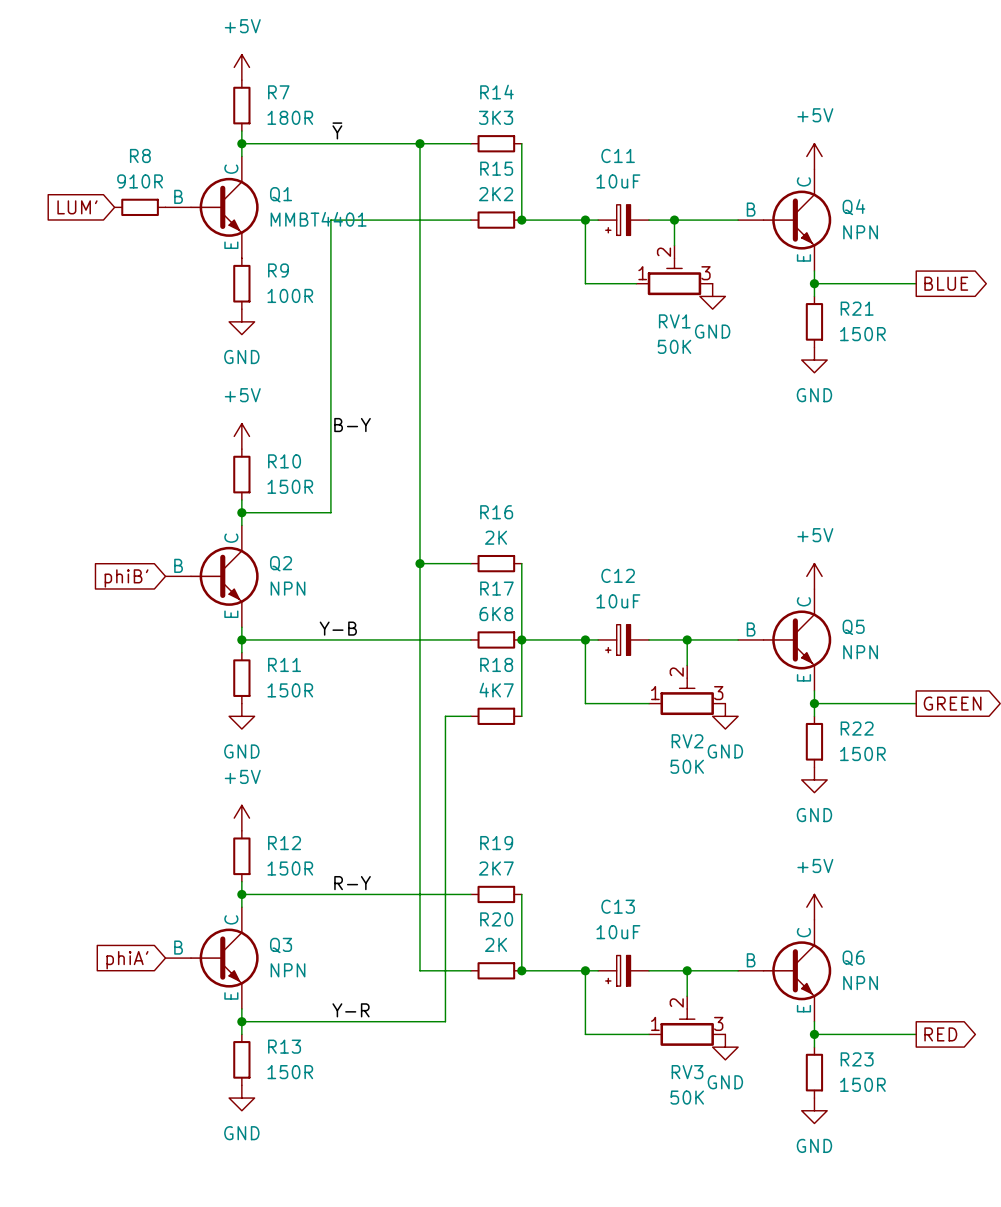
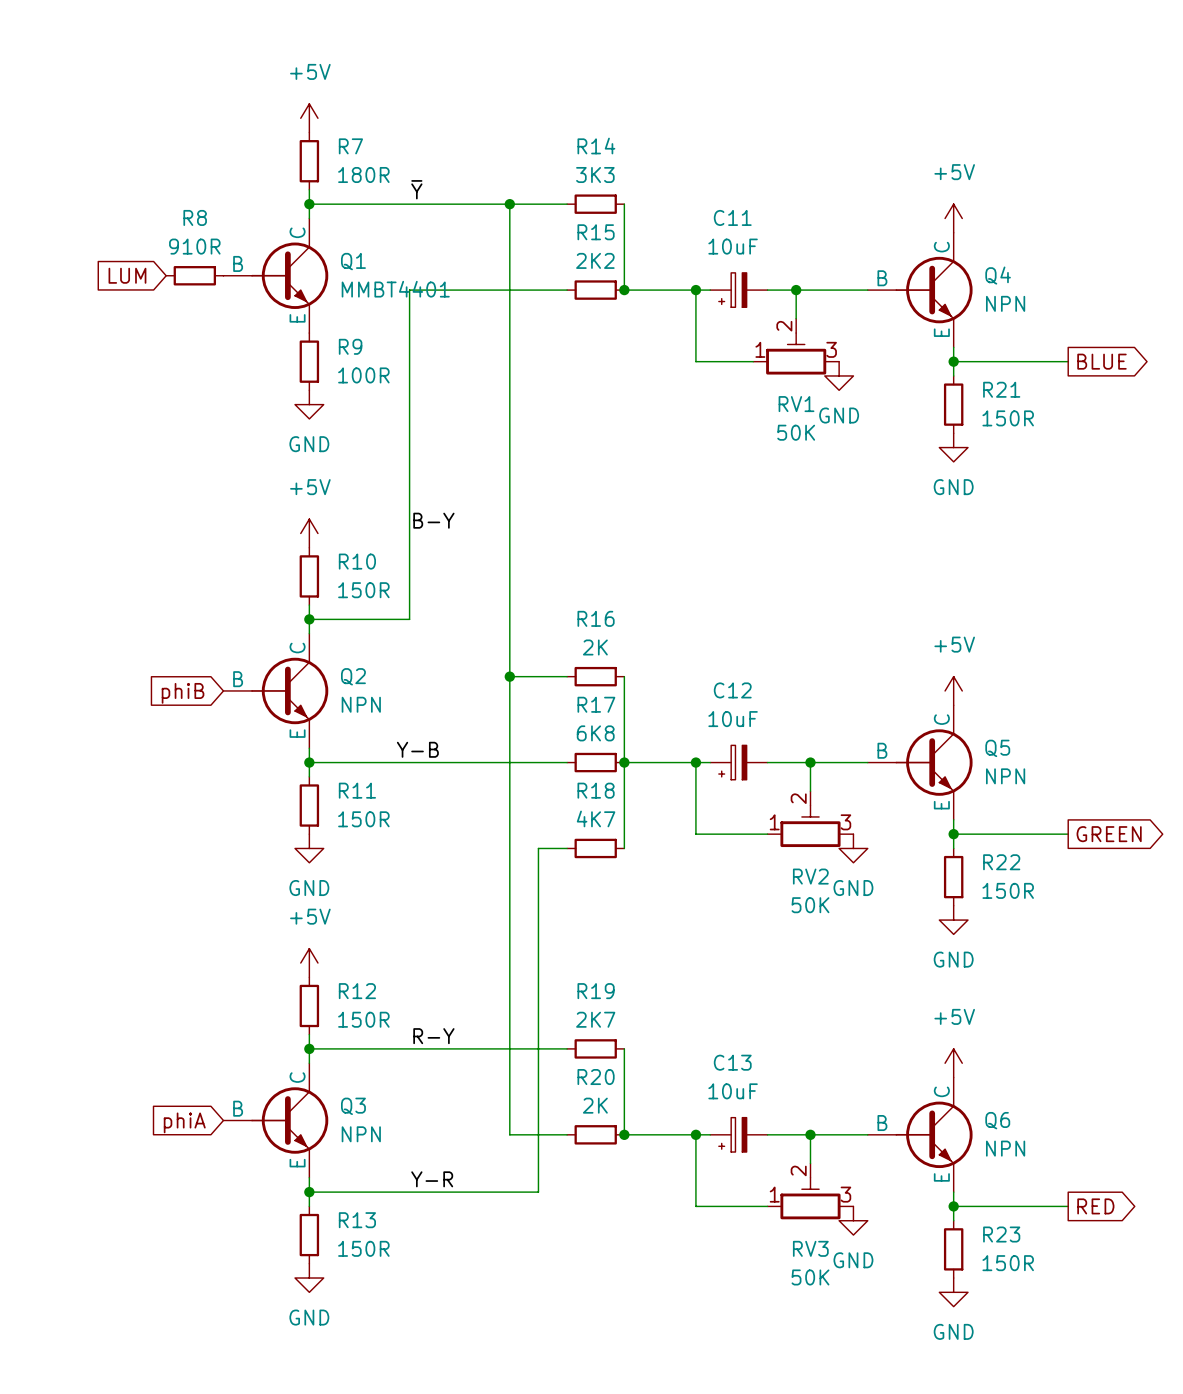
global label: LUM' (77, 207) -> LUM (127, 275)
global label: phiB' (126, 578) -> phiB (183, 693)
global label: phiA' (127, 960) -> phiA (184, 1122)

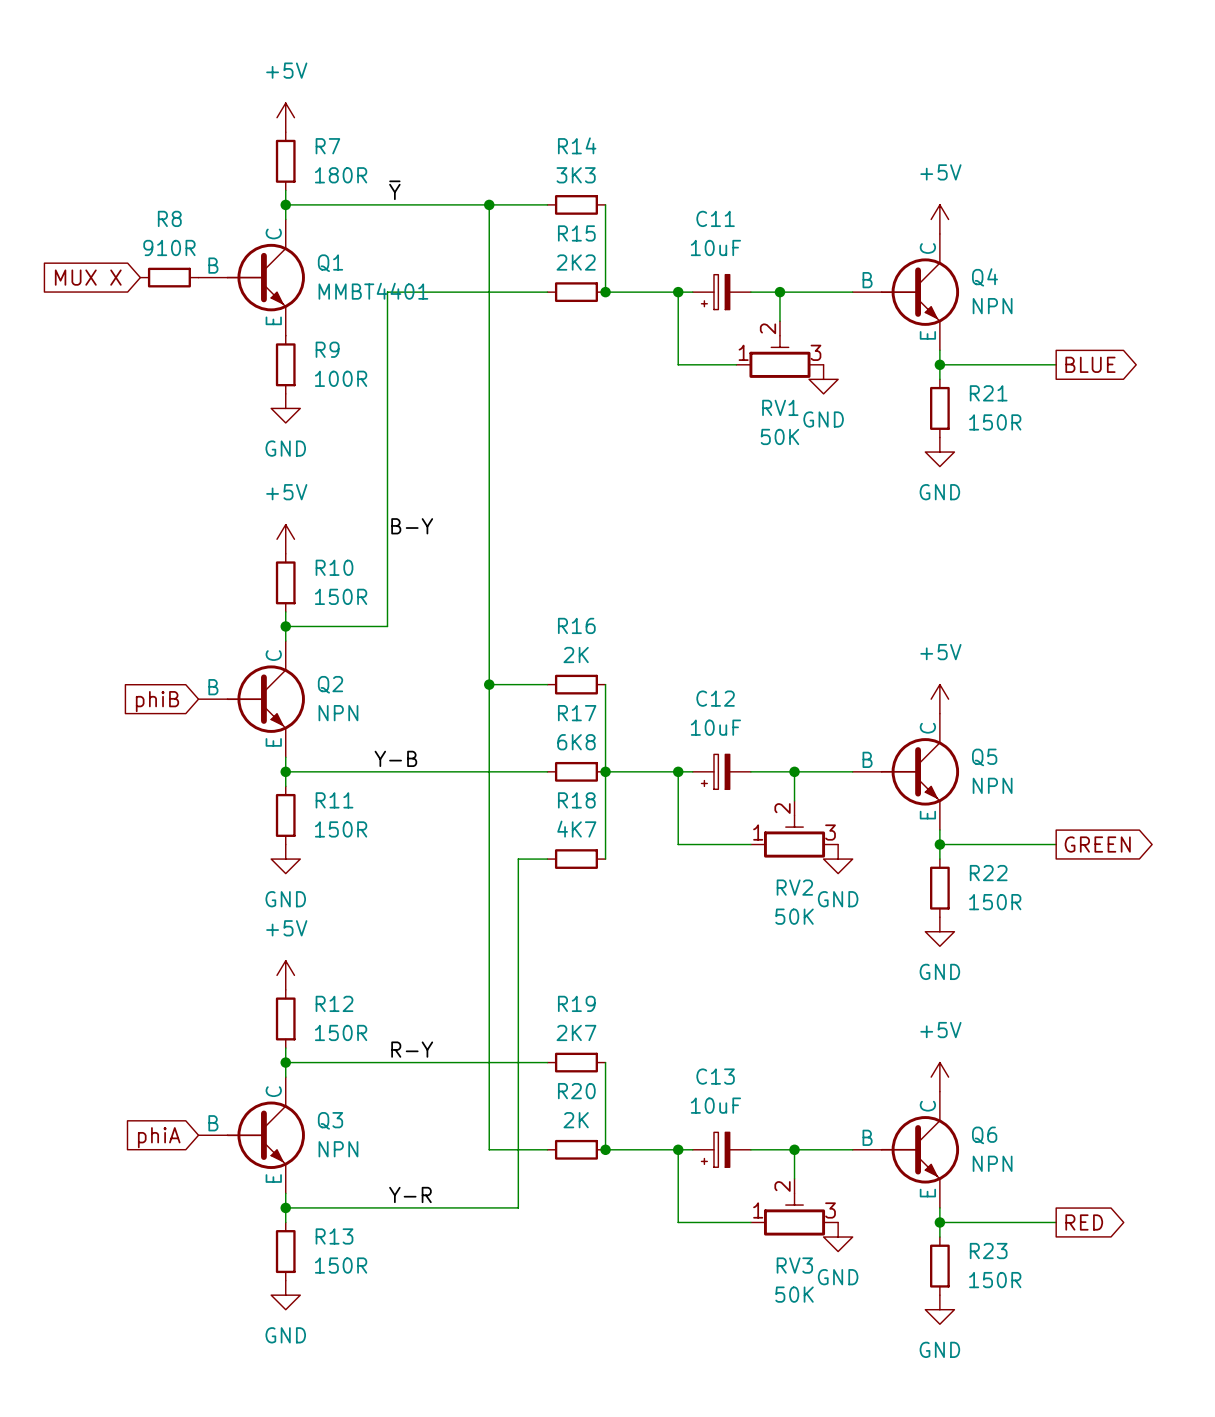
global label: LUM (127, 275) -> MUX X (88, 277)

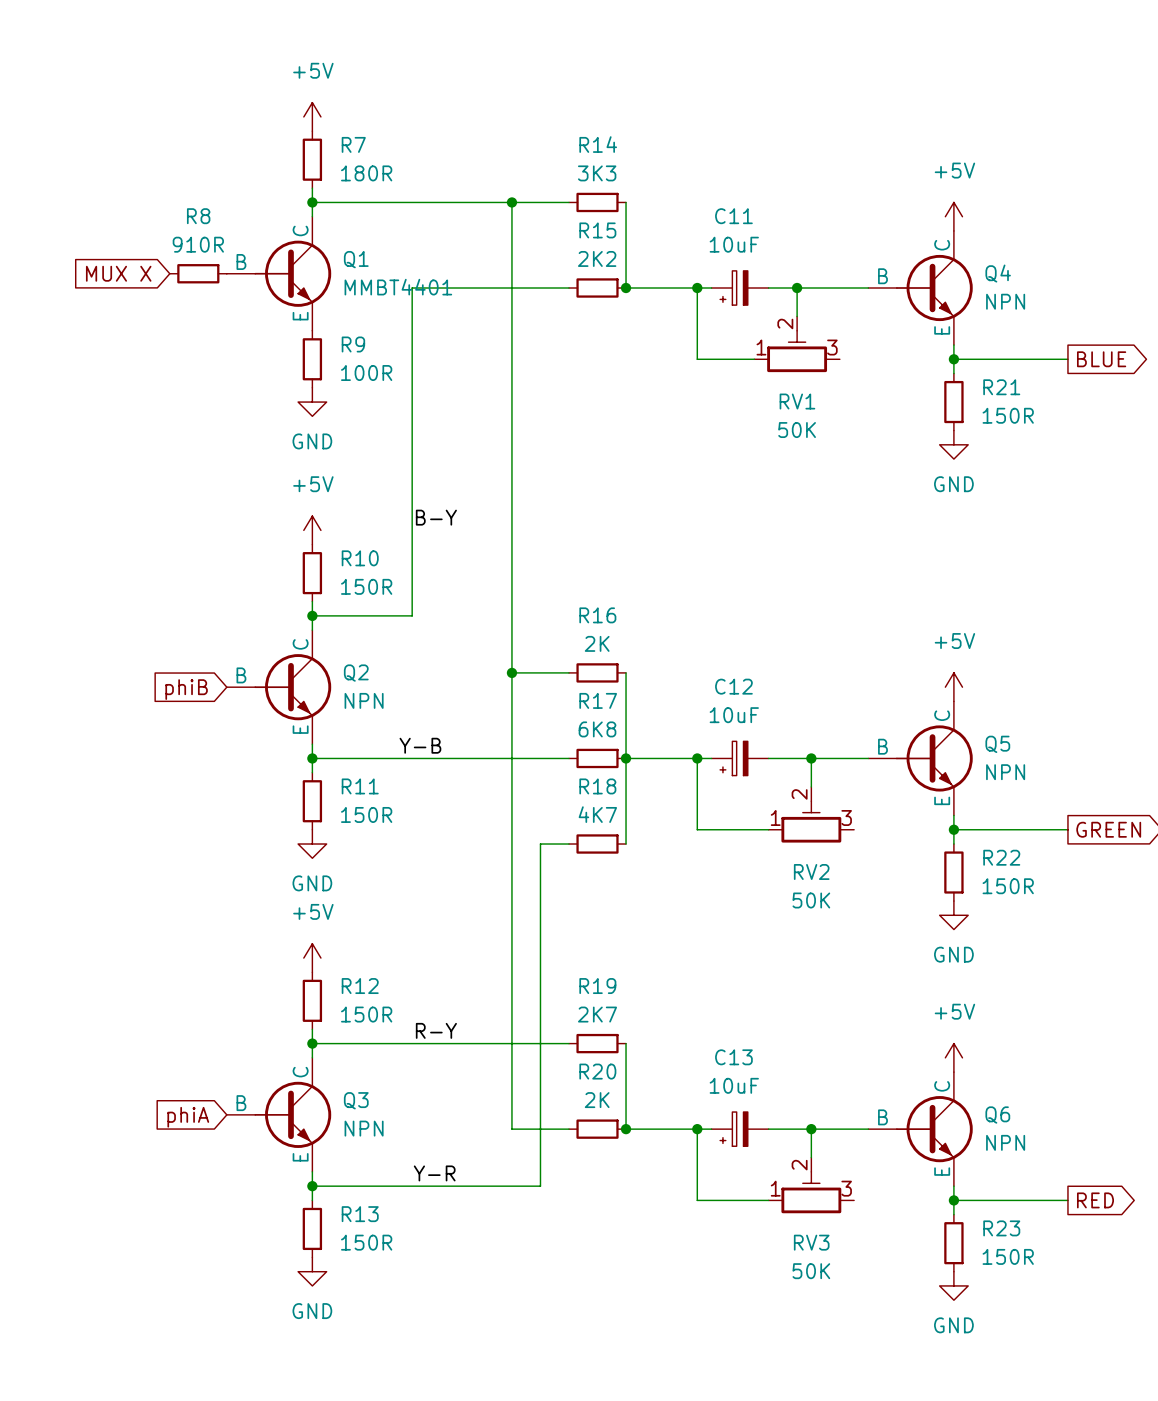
label: ~{Y} (394, 190) -> none
power symbol: GND (823, 379) -> none
power symbol: GND (838, 859) -> none
power symbol: GND (838, 1237) -> none

